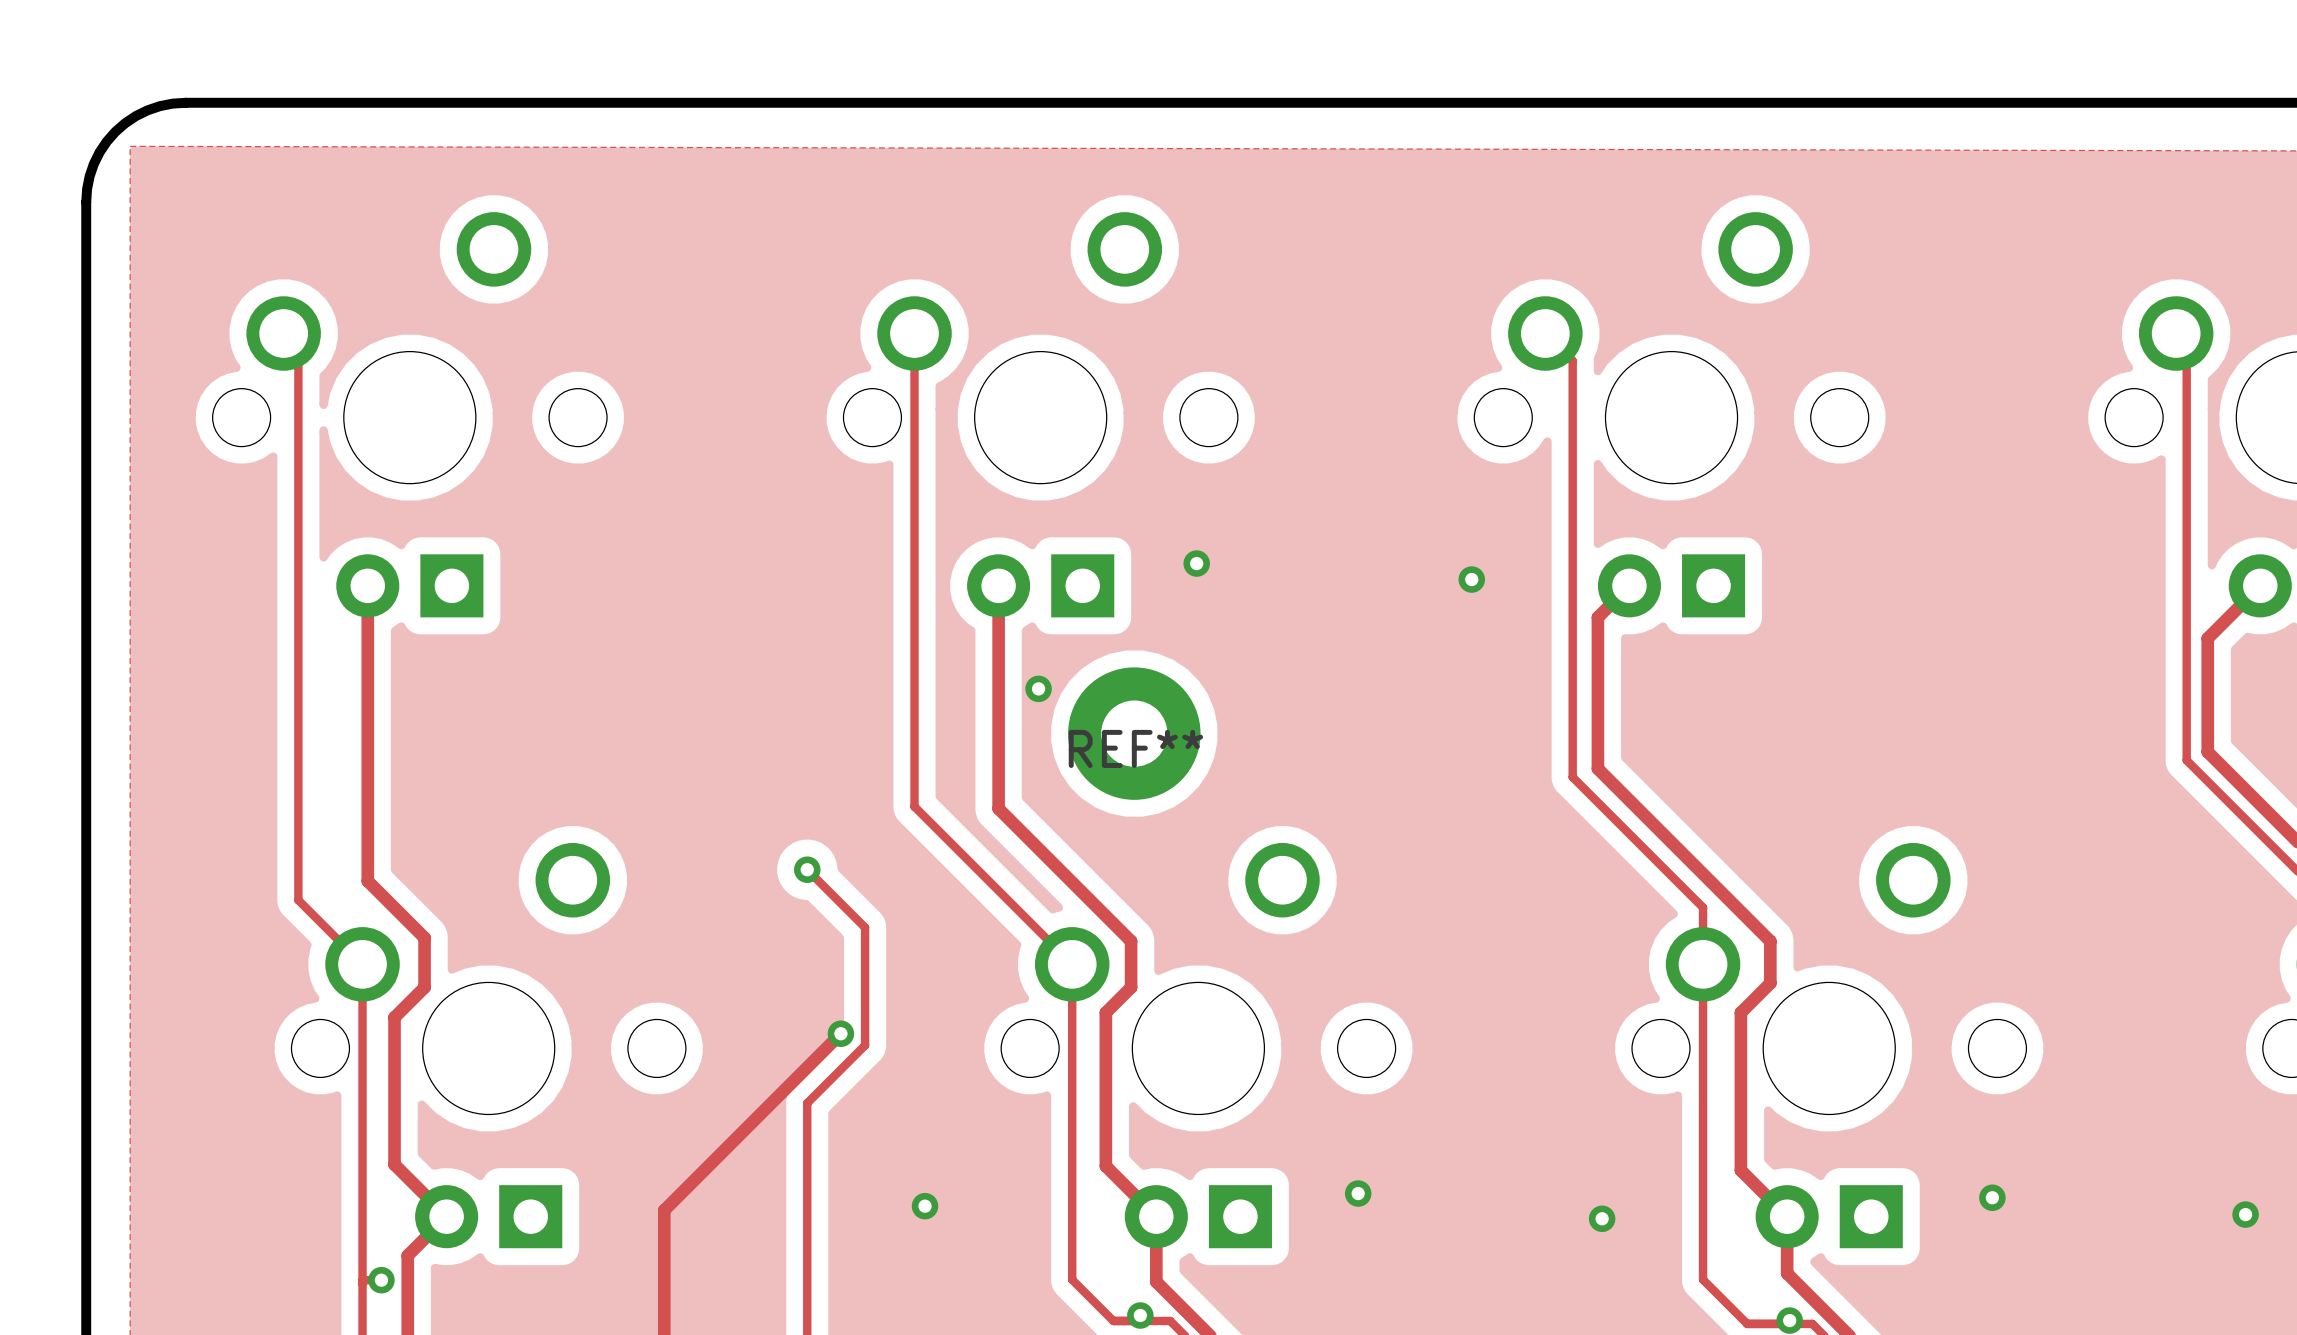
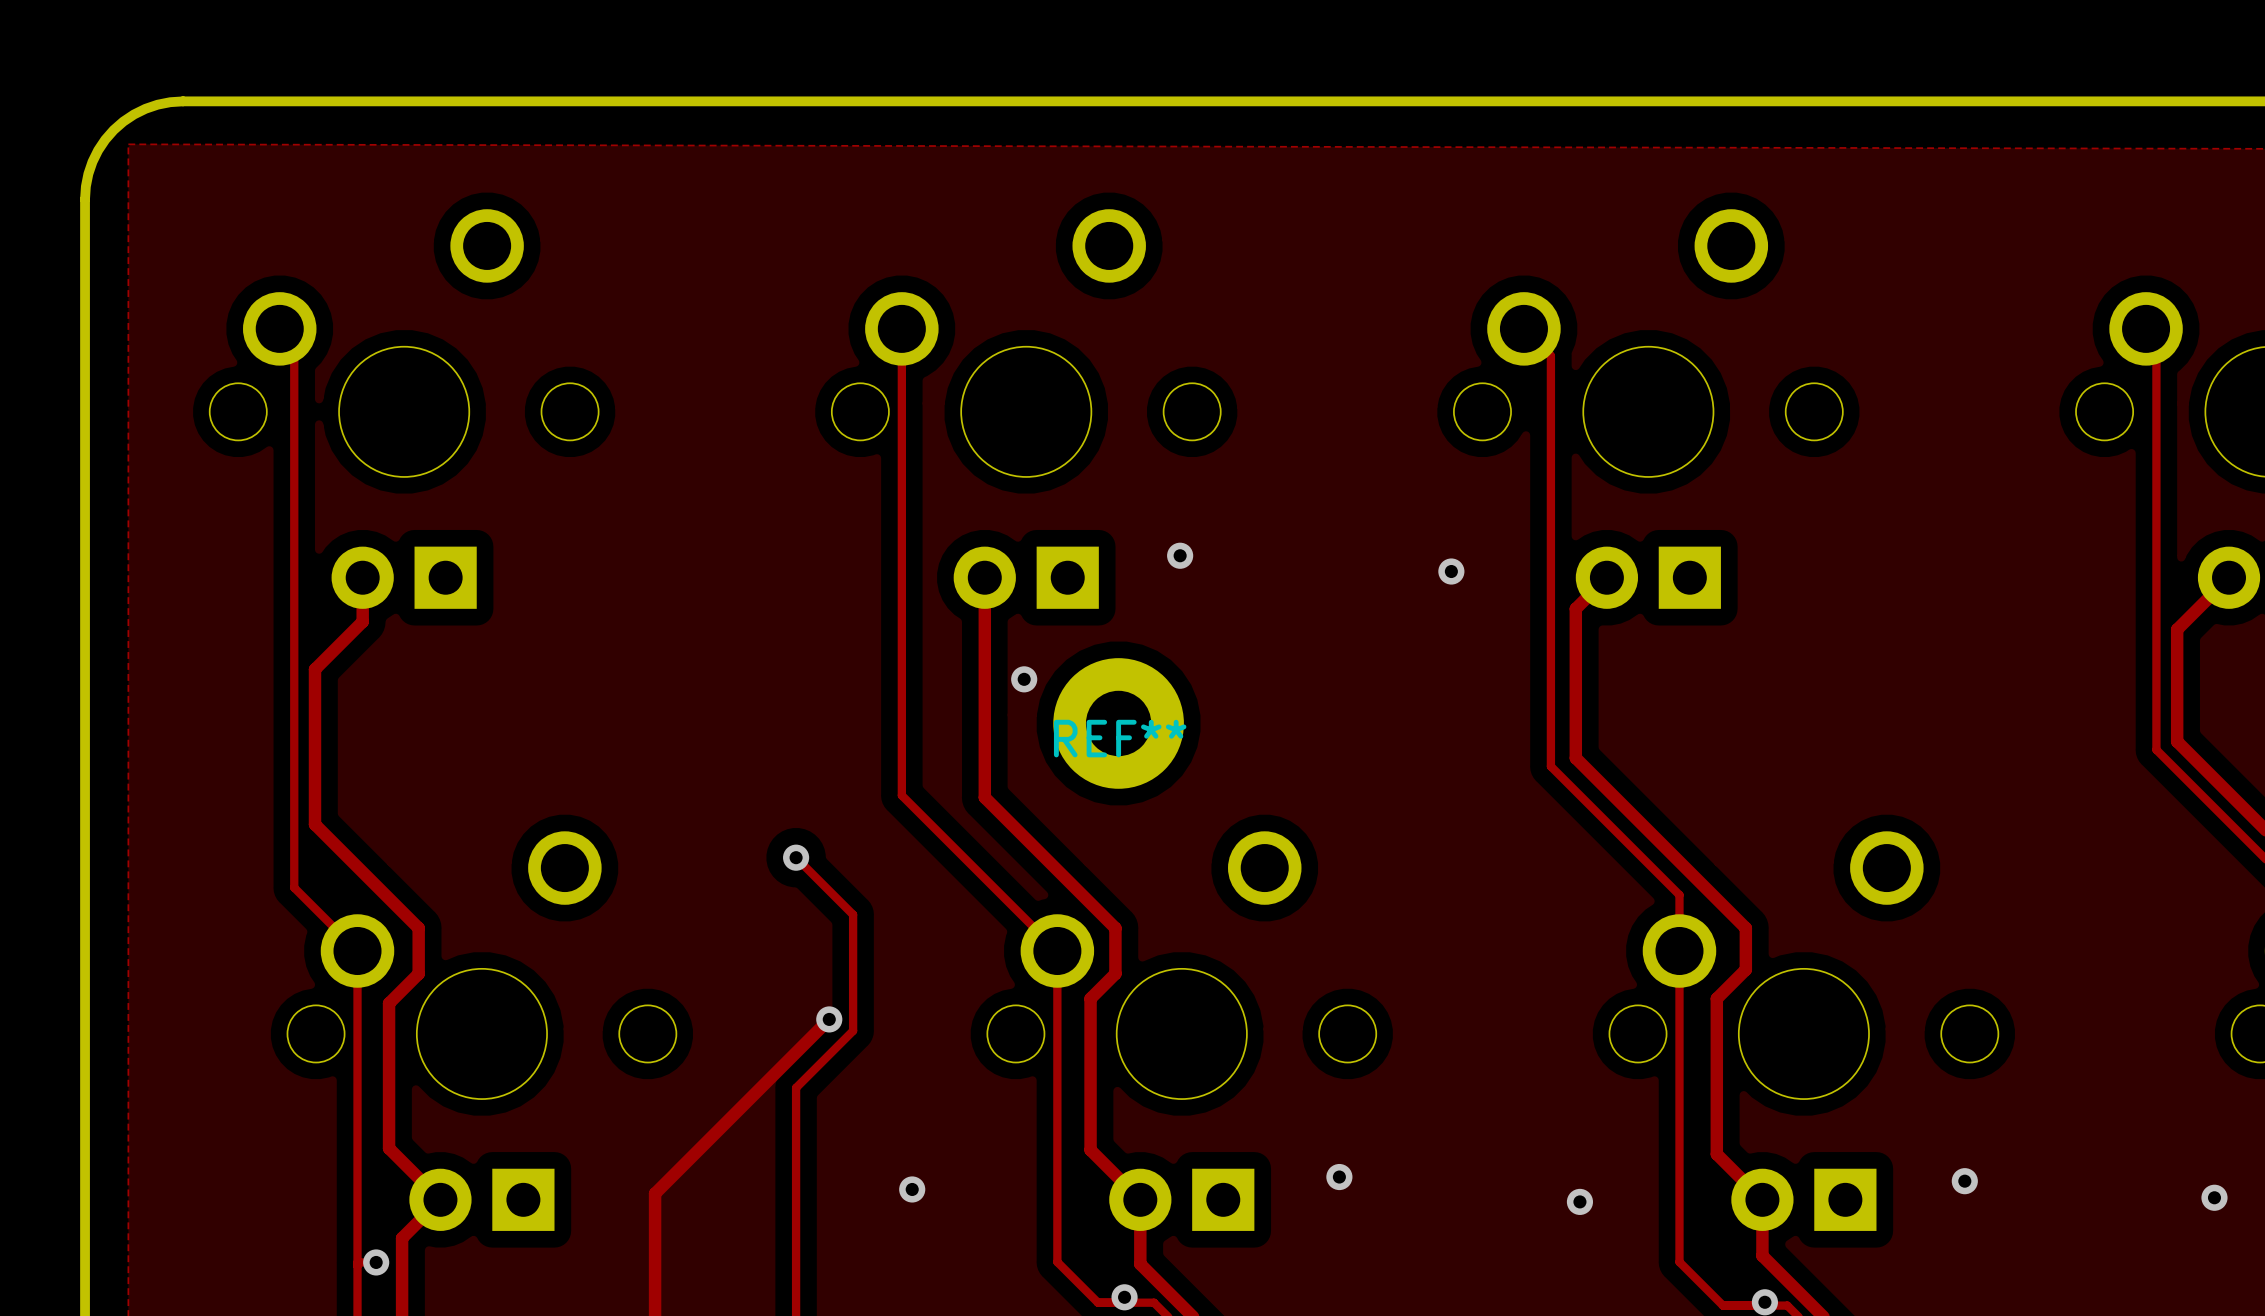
track: (367, 630) (367, 881) (424, 937) (424, 941) -> (362, 621) (314, 669) (314, 824) (418, 928)

